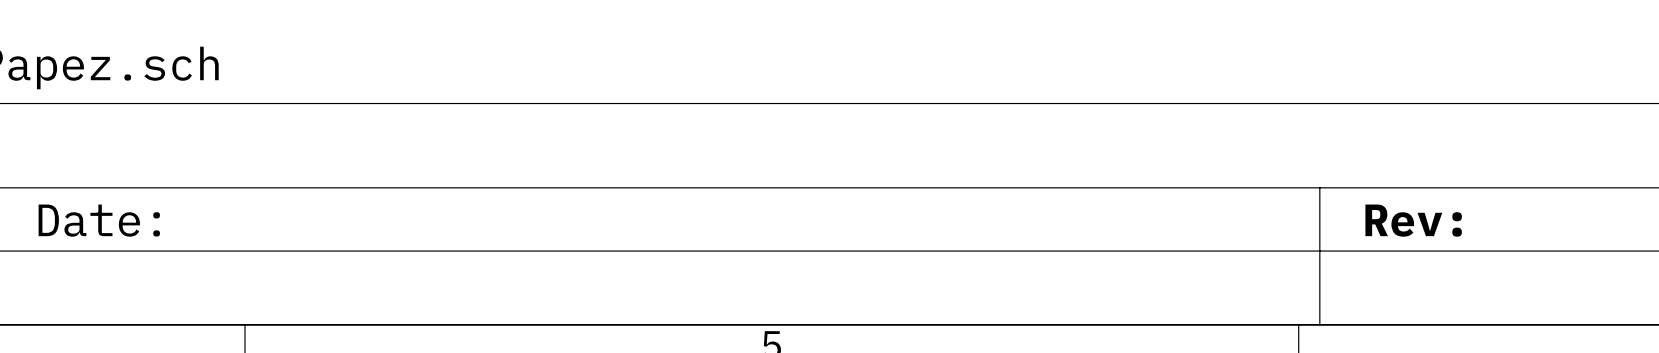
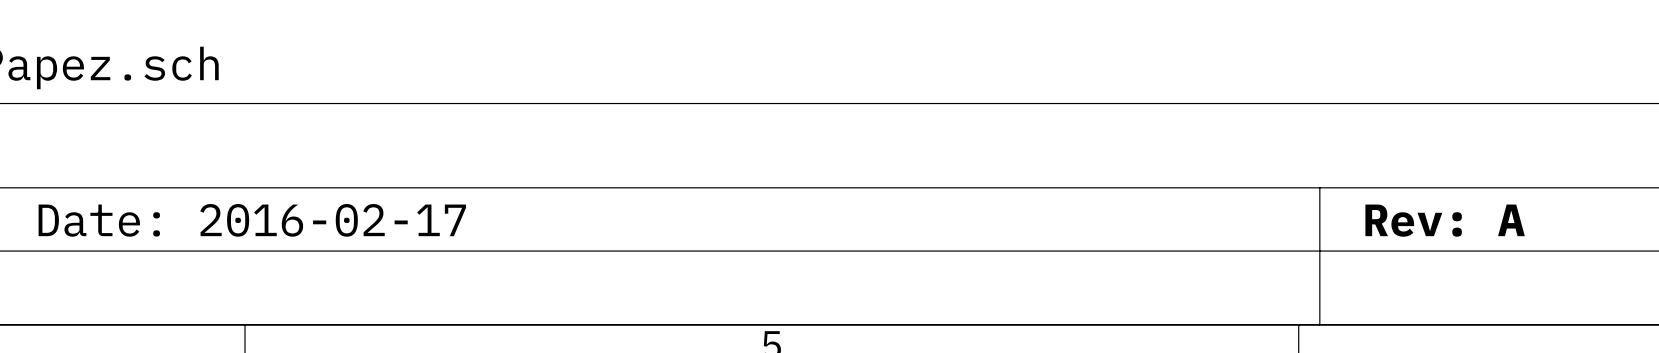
title block: Date: (99, 220) -> Date: 2016-02-17 (252, 220)
title block: Rev: (1413, 220) -> Rev: A (1445, 220)

